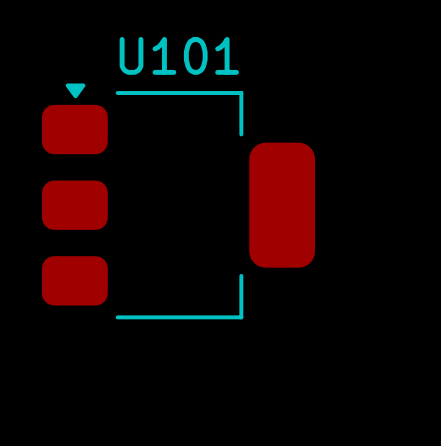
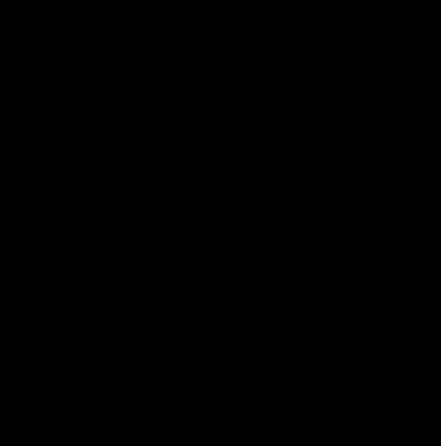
U101: (178, 201) -> none

